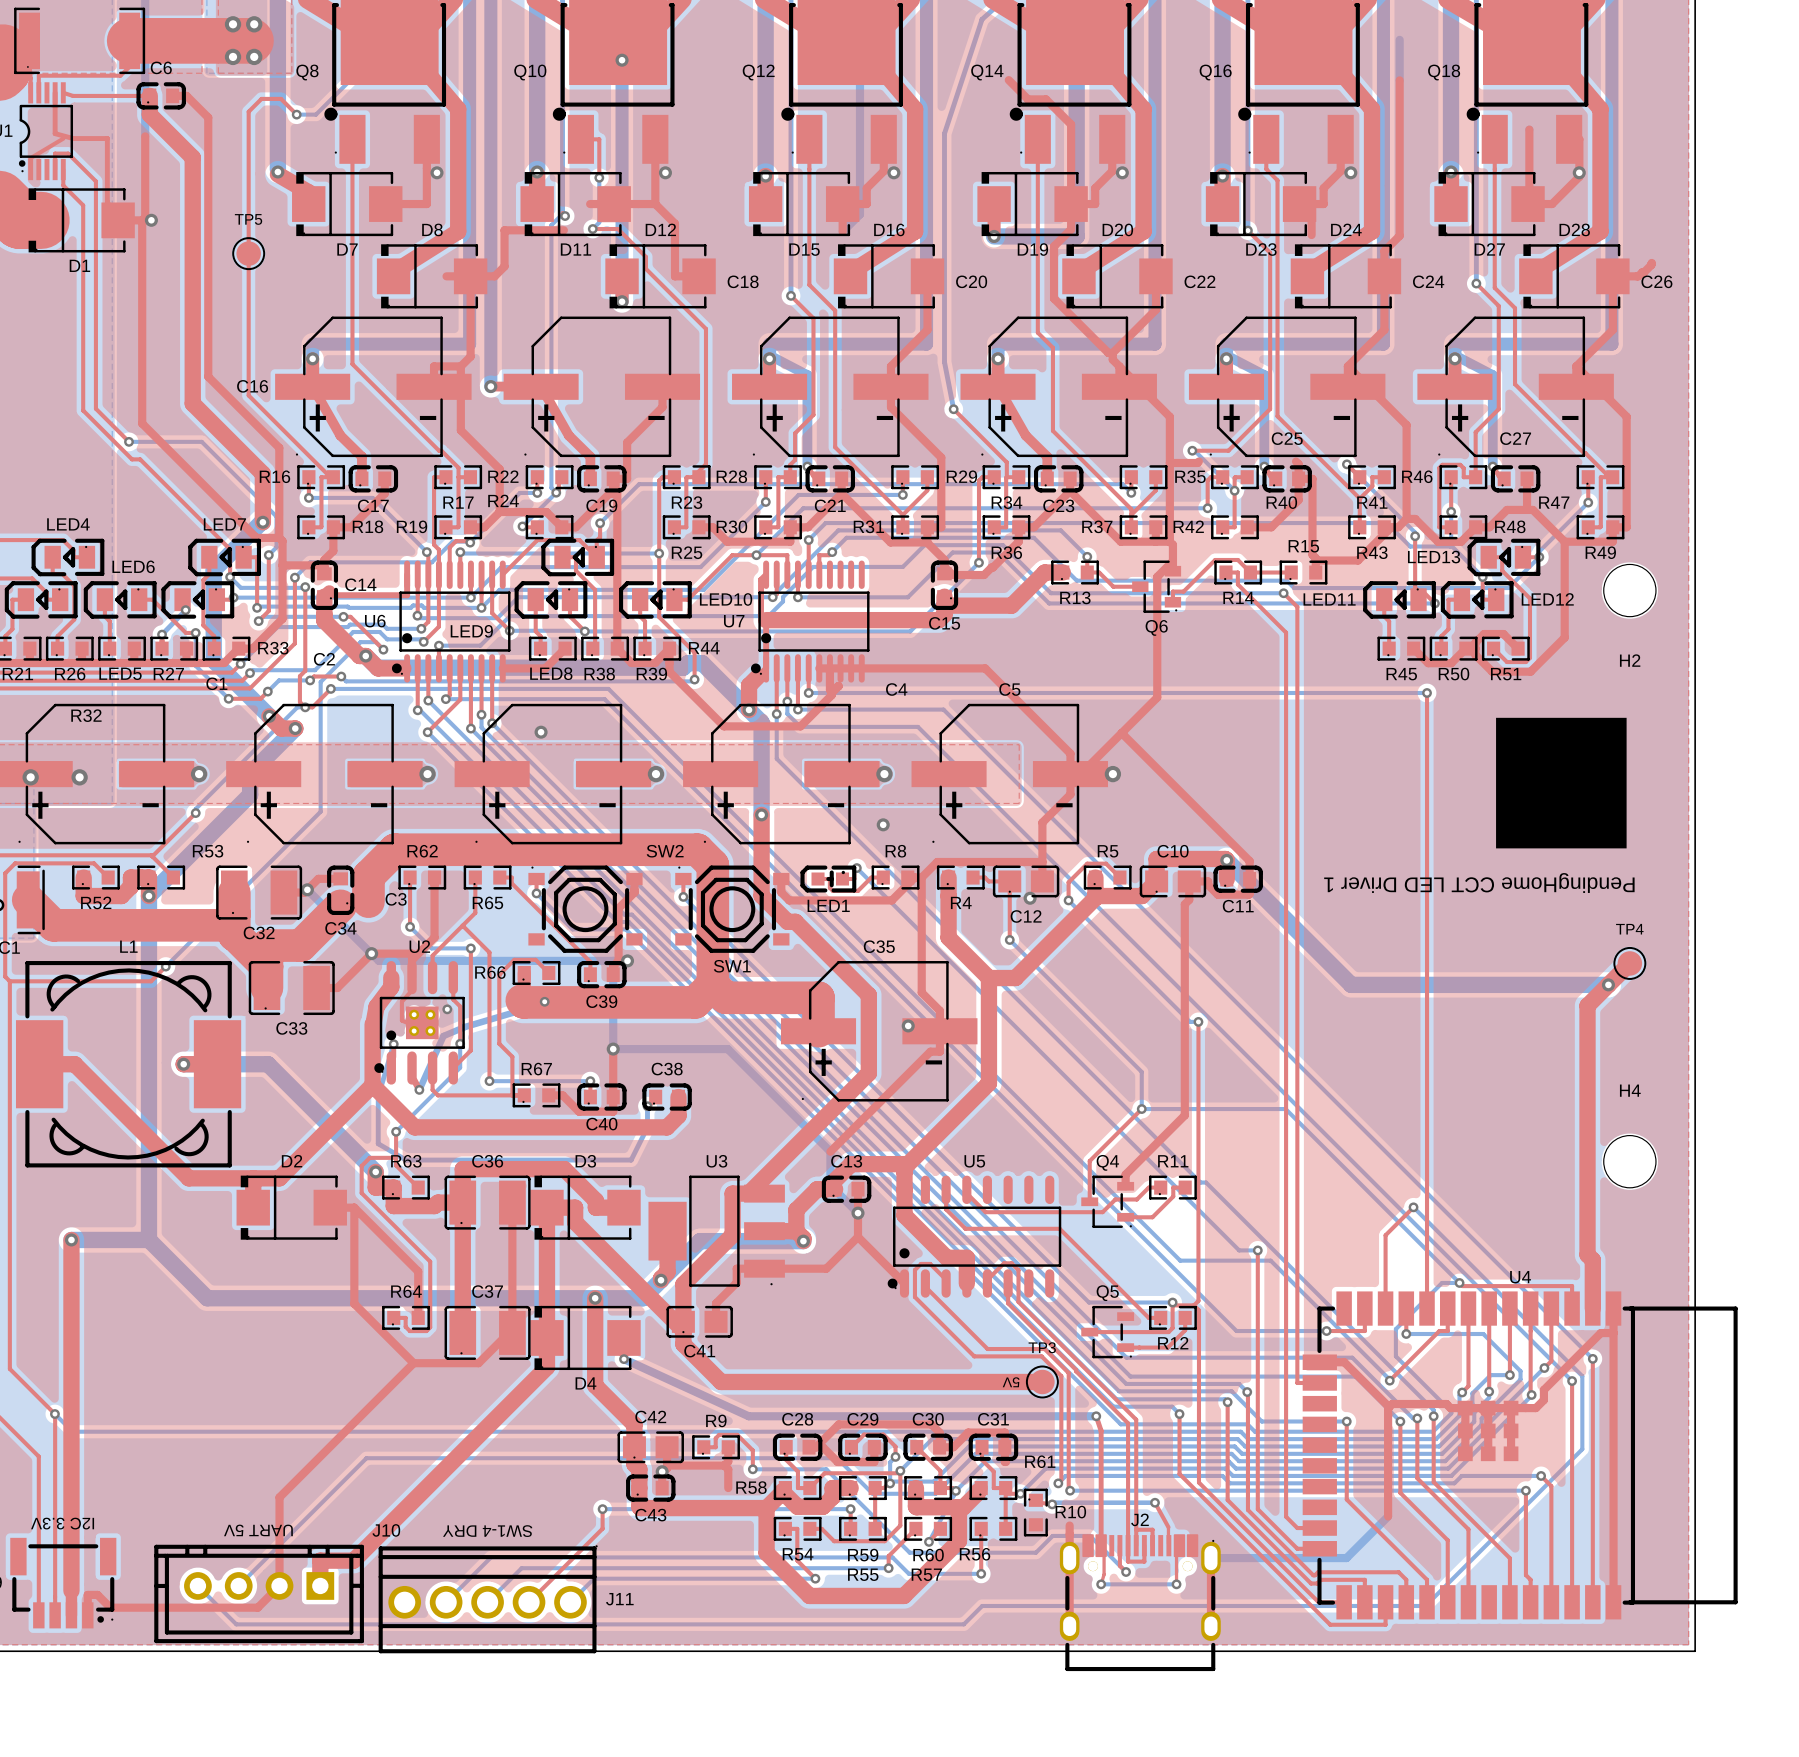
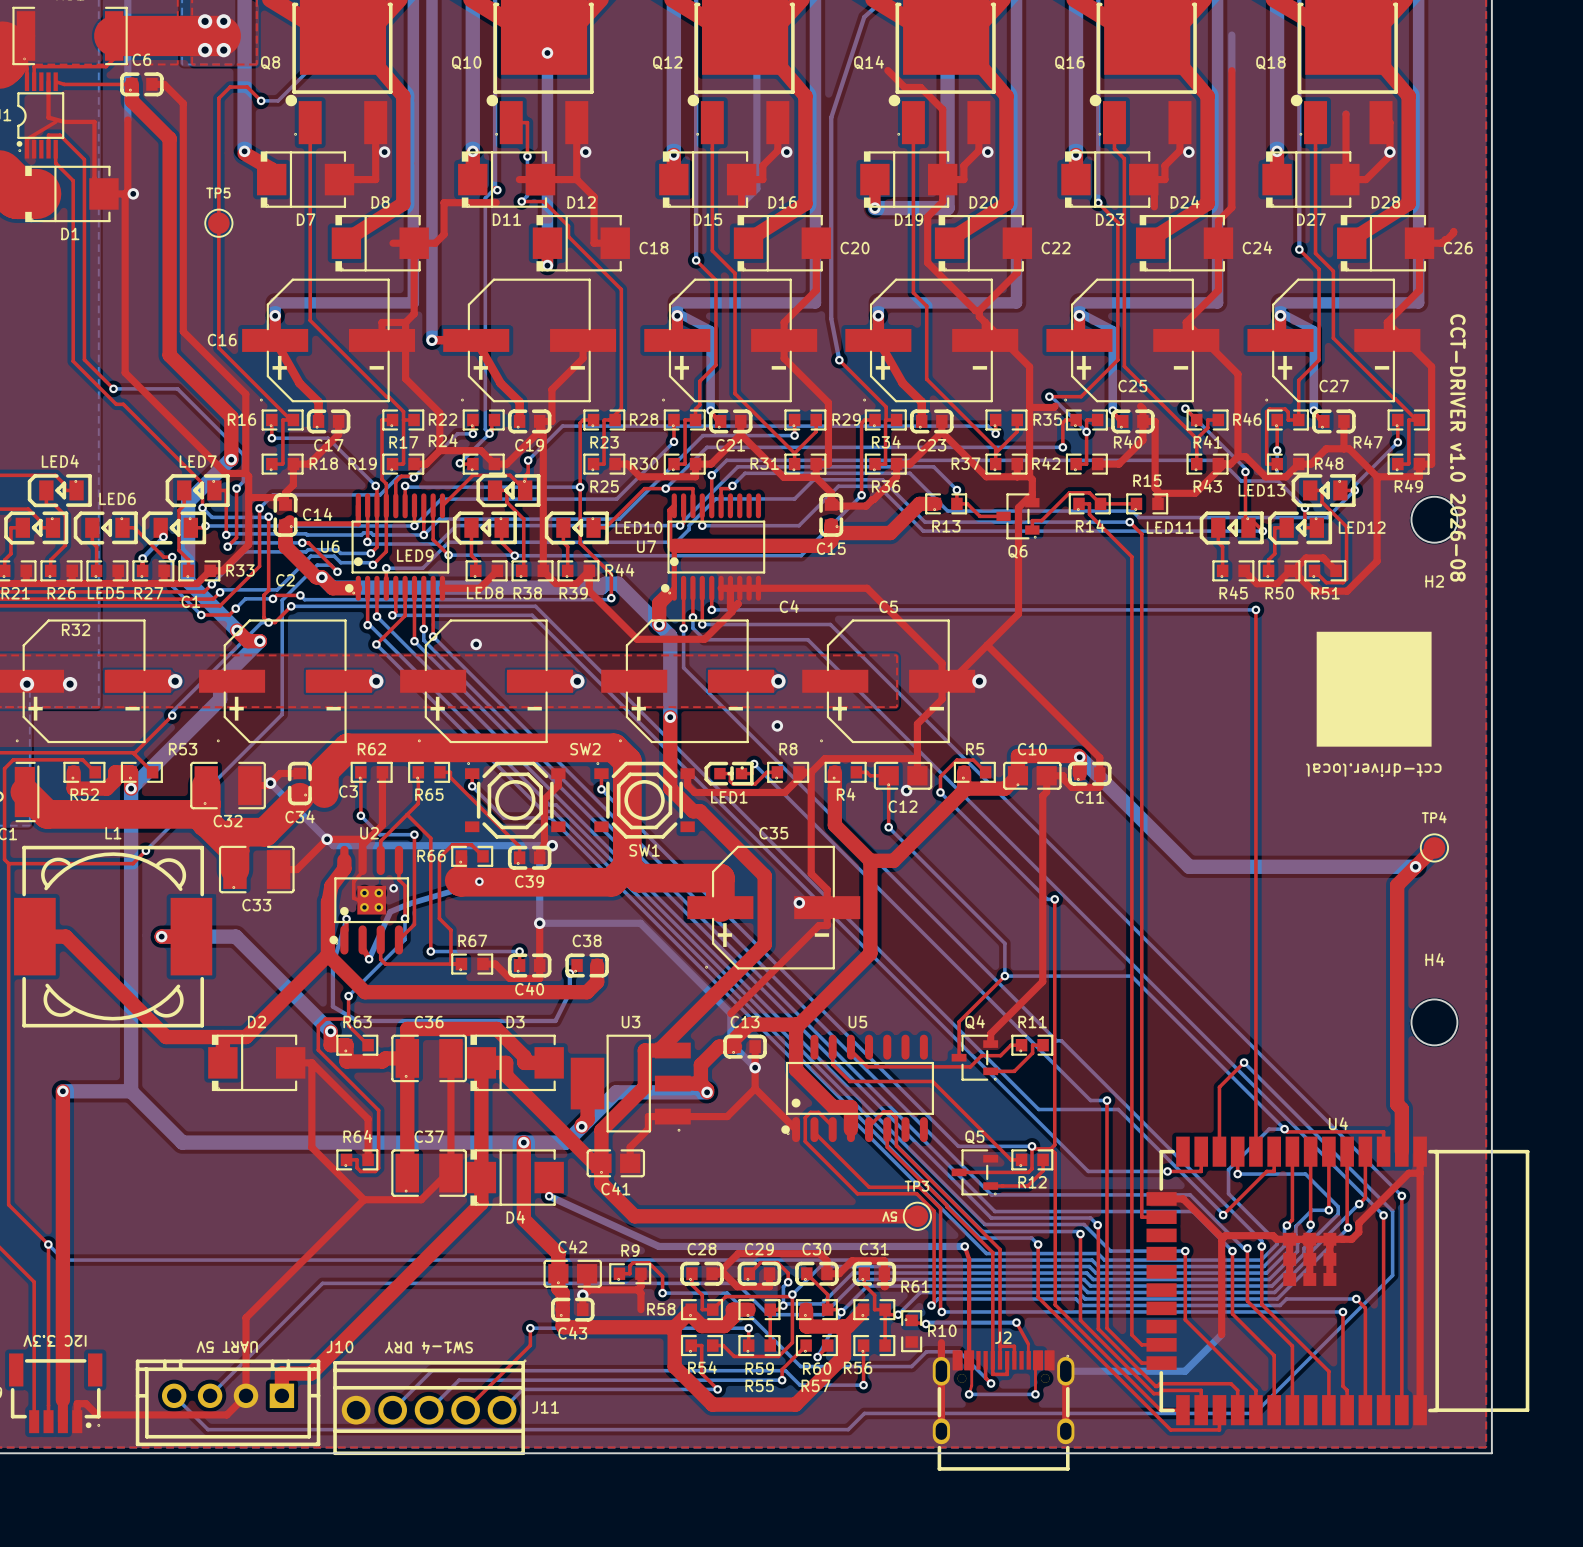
text: none -> CCT-DRIVER v1.0 2026-08 (1457, 447)
text: none -> cct-driver.local (1373, 770)
text: PendingHome CCT LED Driver 1 (1479, 883) -> none

